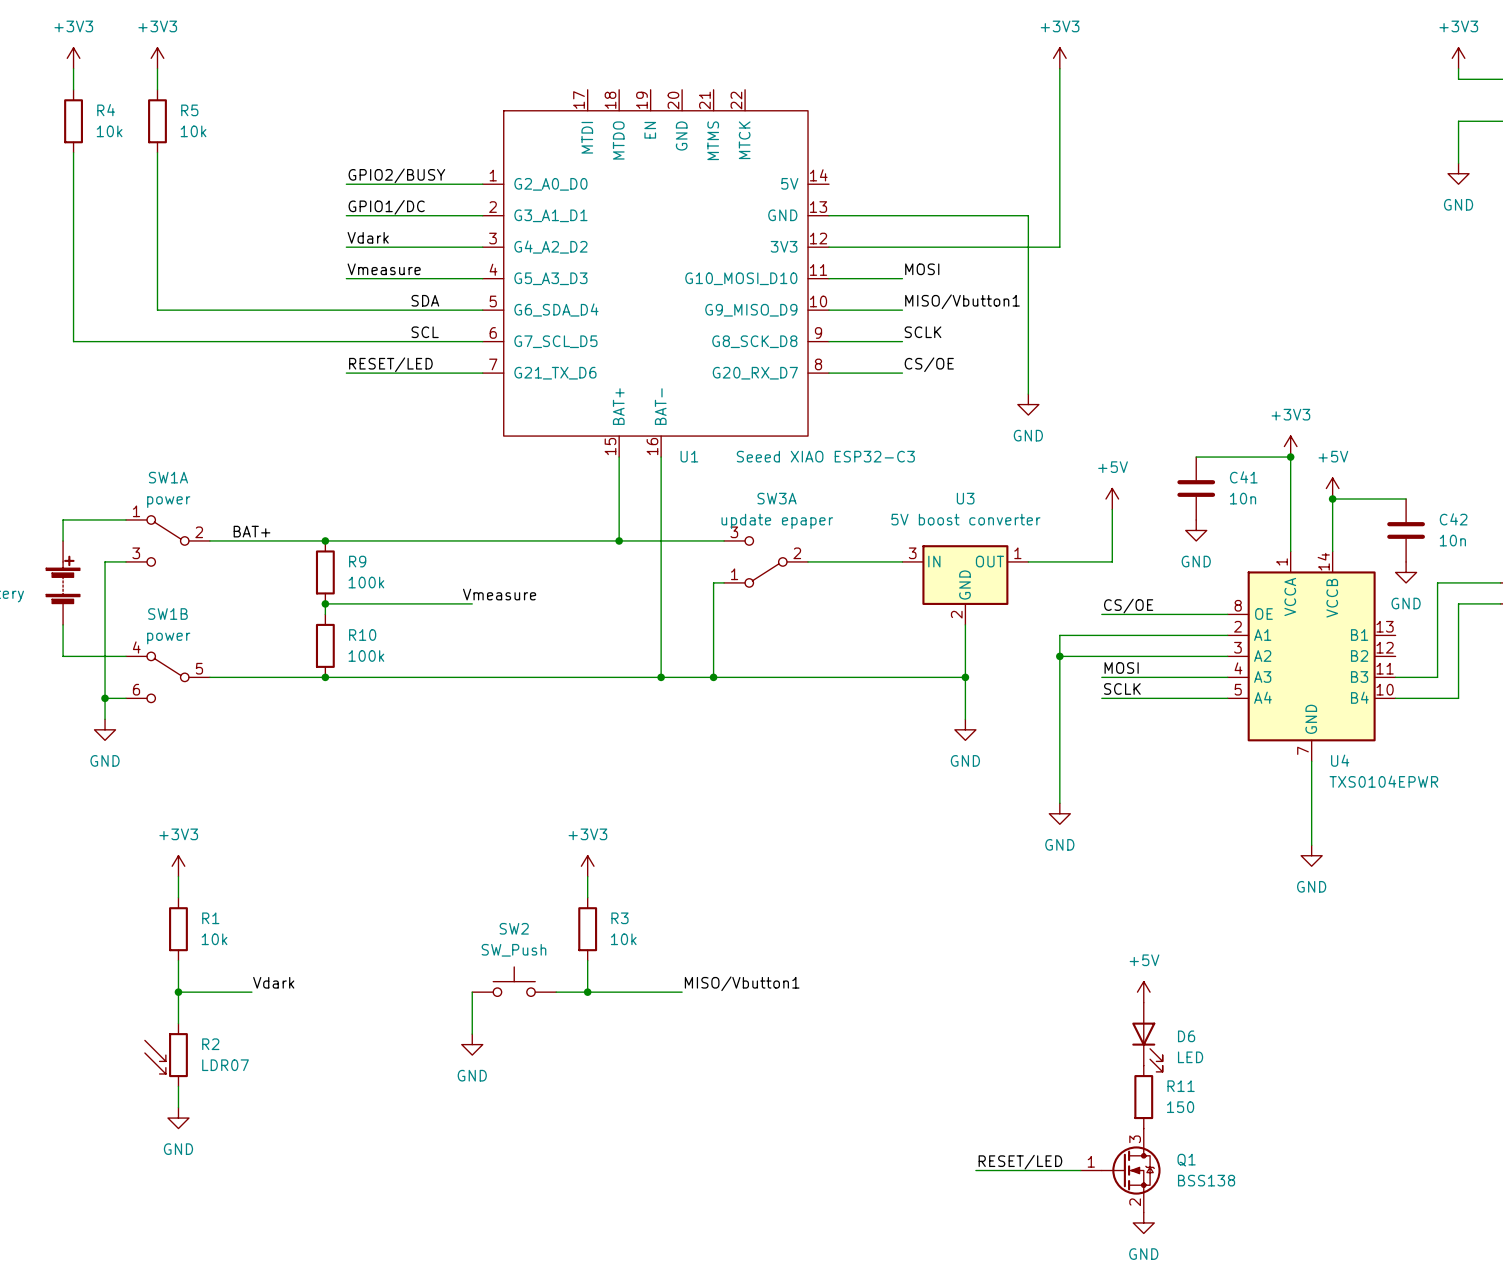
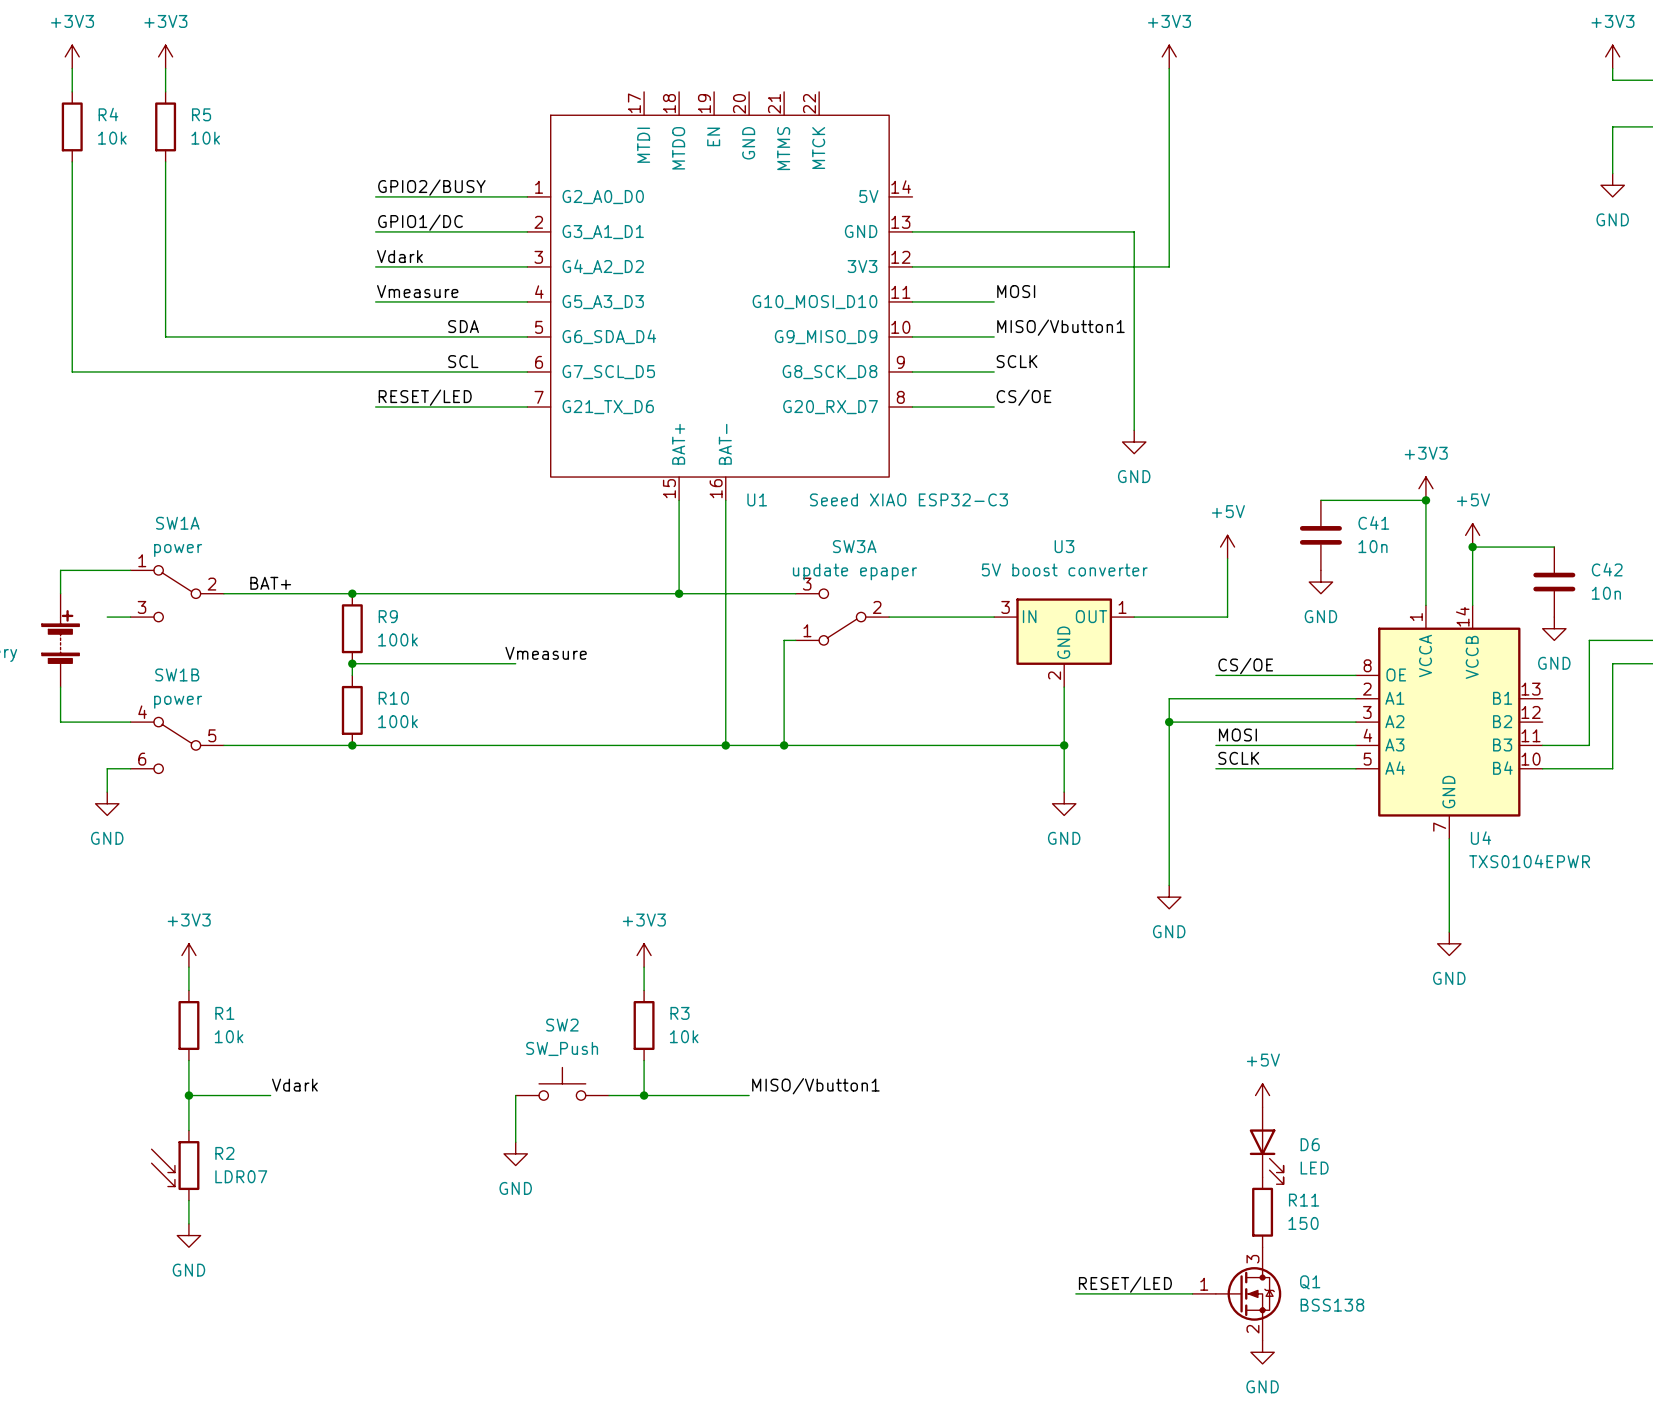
wire: (105, 561) (105, 698) -> none
junction: (105, 698) -> none

